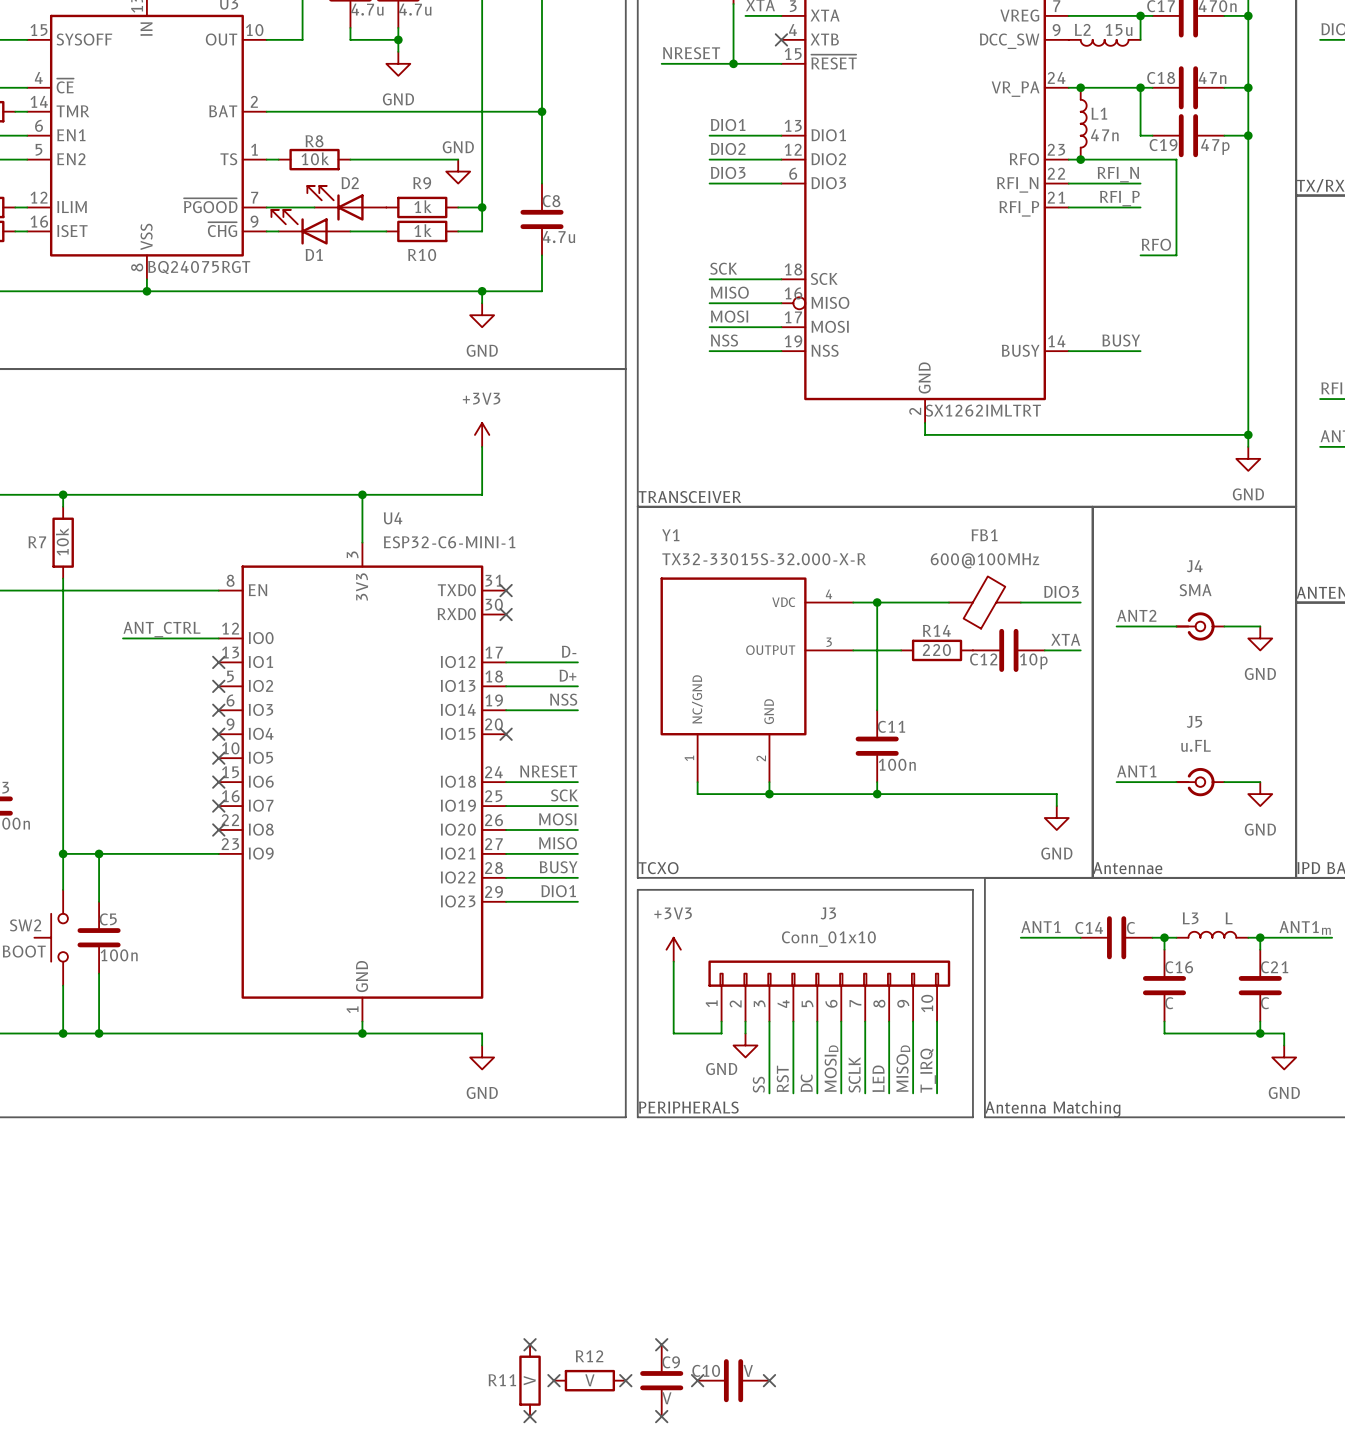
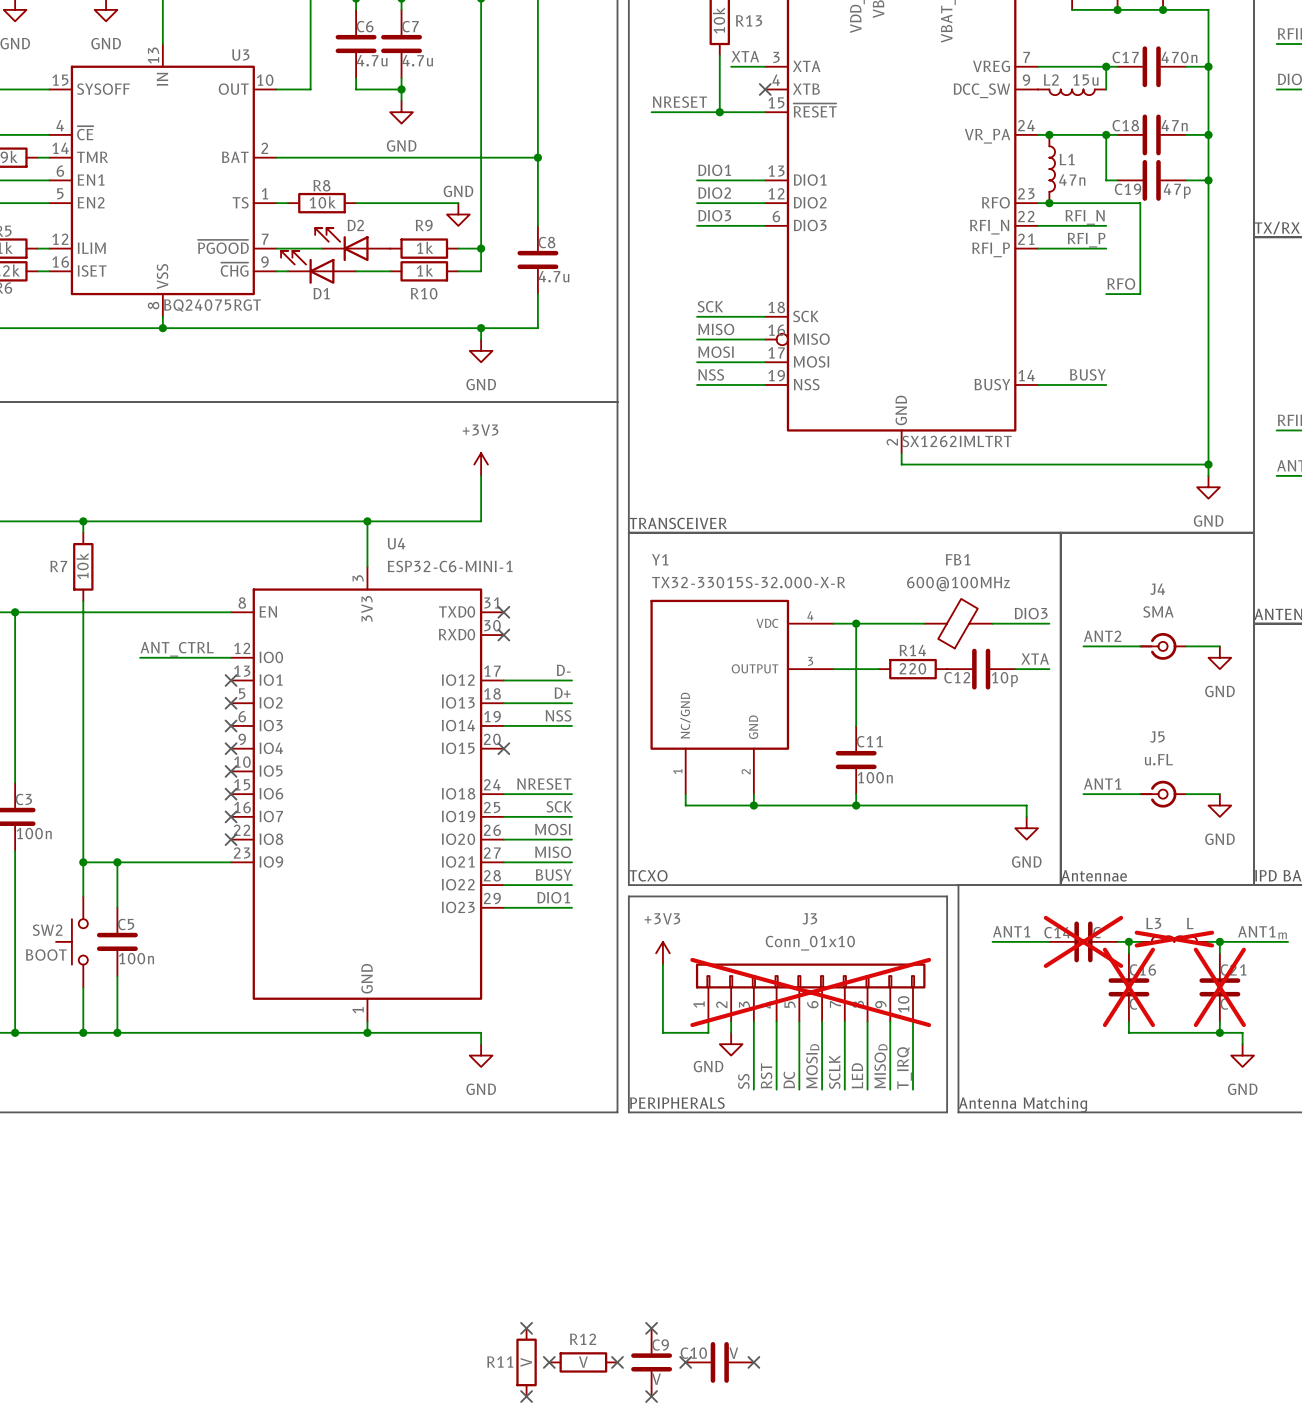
L3 do-not-place cross: none -> (1174, 939)
C14 do-not-place cross: none -> (1083, 941)
C16 do-not-place cross: none -> (1128, 987)
C21 do-not-place cross: none -> (1219, 987)
J3 do-not-place cross: none -> (810, 992)

